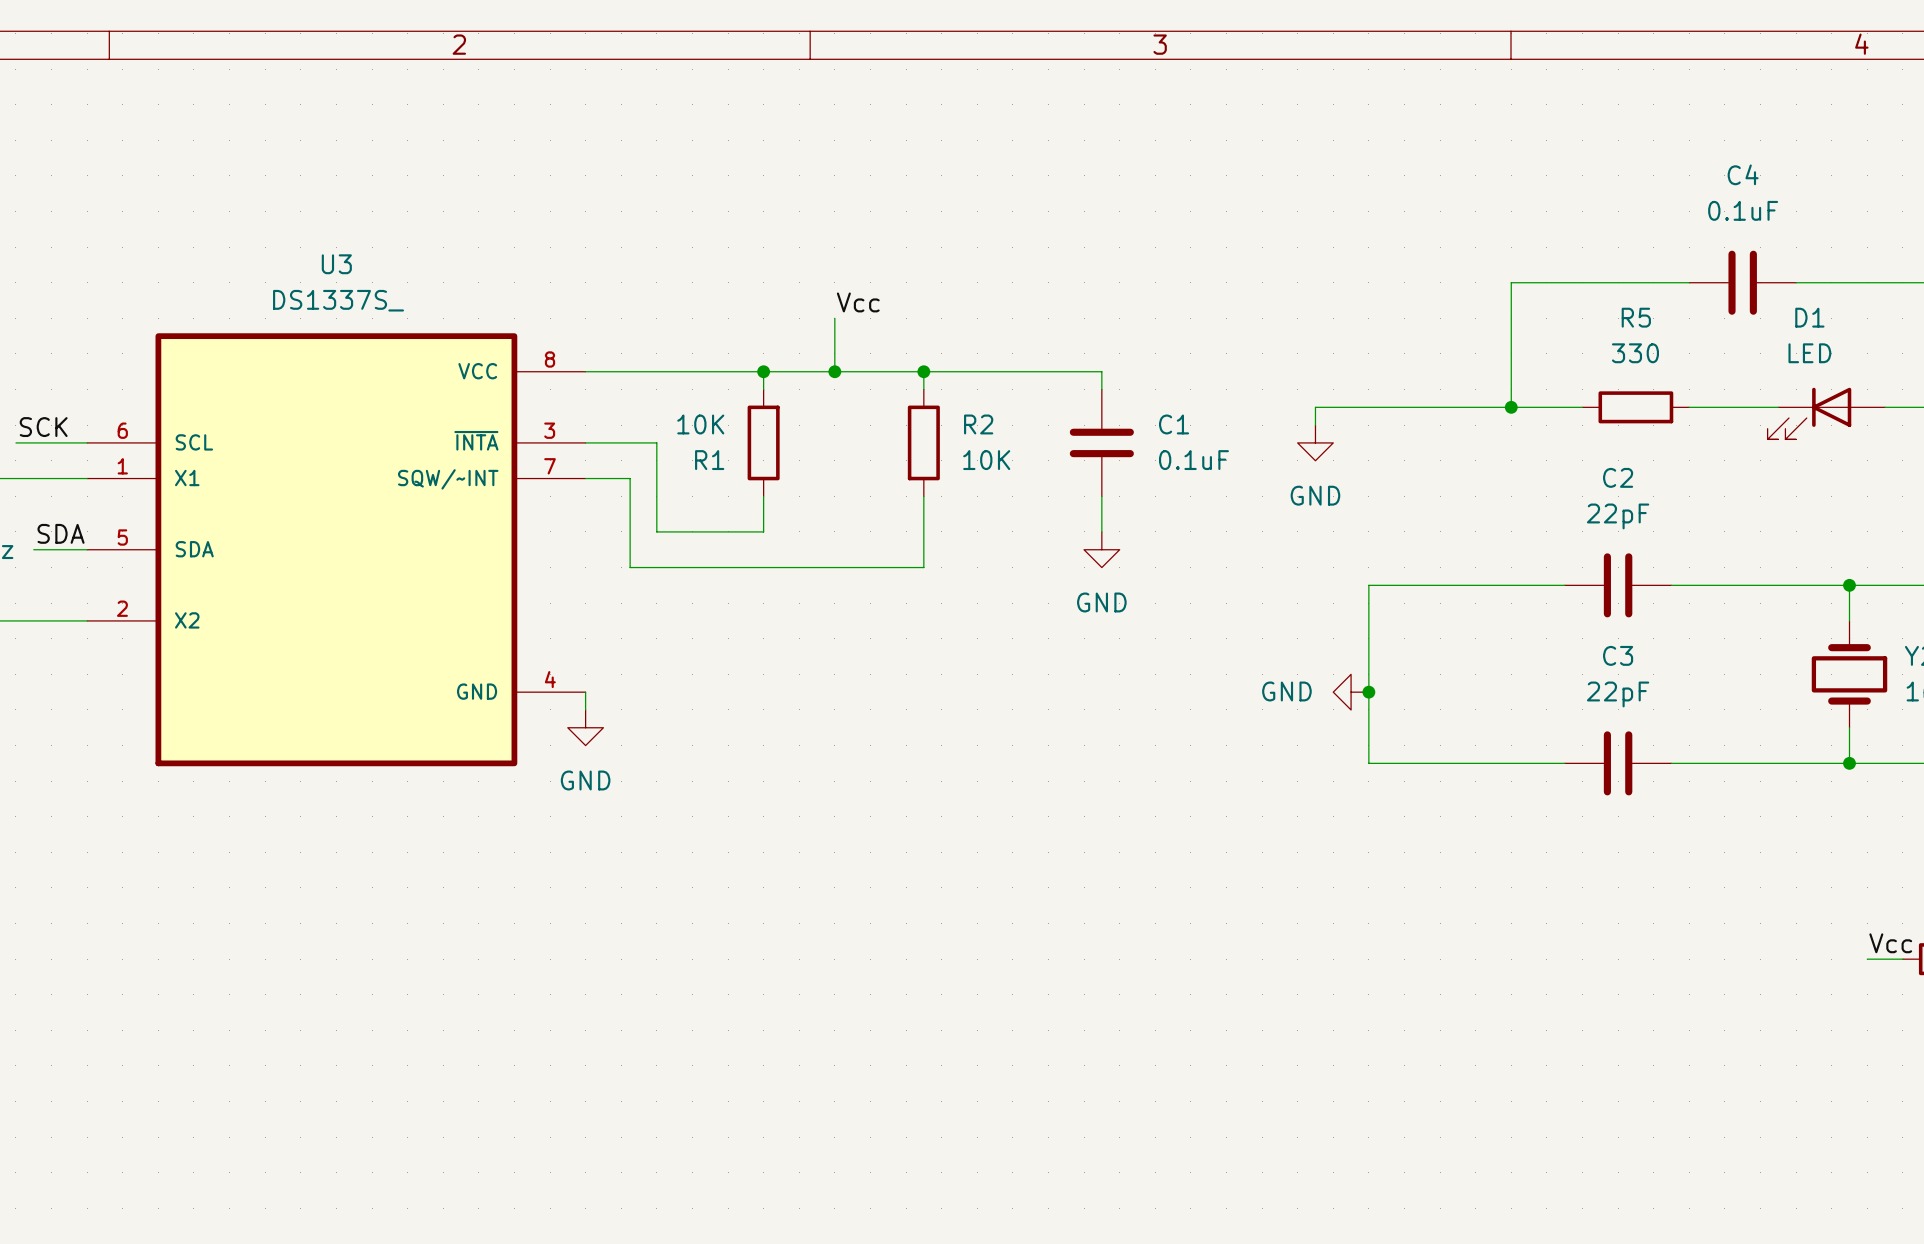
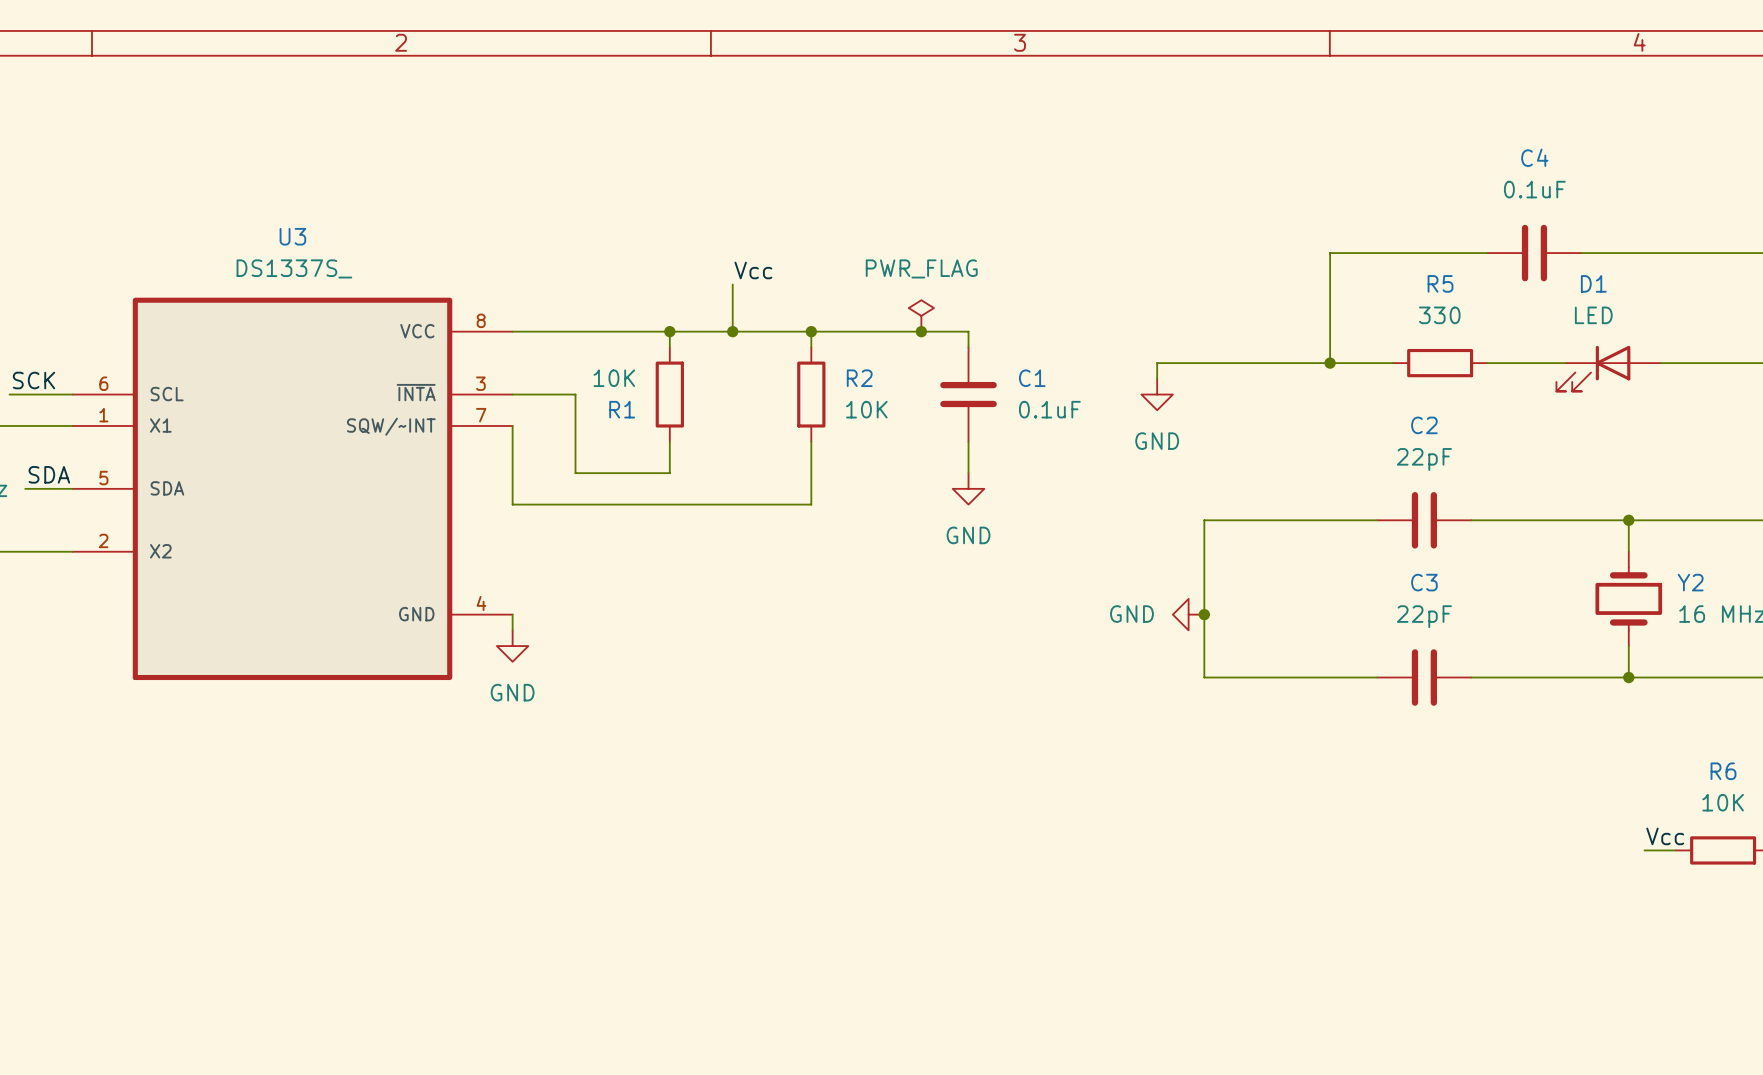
power symbol: none -> PWR_FLAG (921, 315)
junction: none -> (921, 331)
wire: (585, 478) (630, 478) (630, 567) -> (512, 425) (512, 504) (551, 504)

